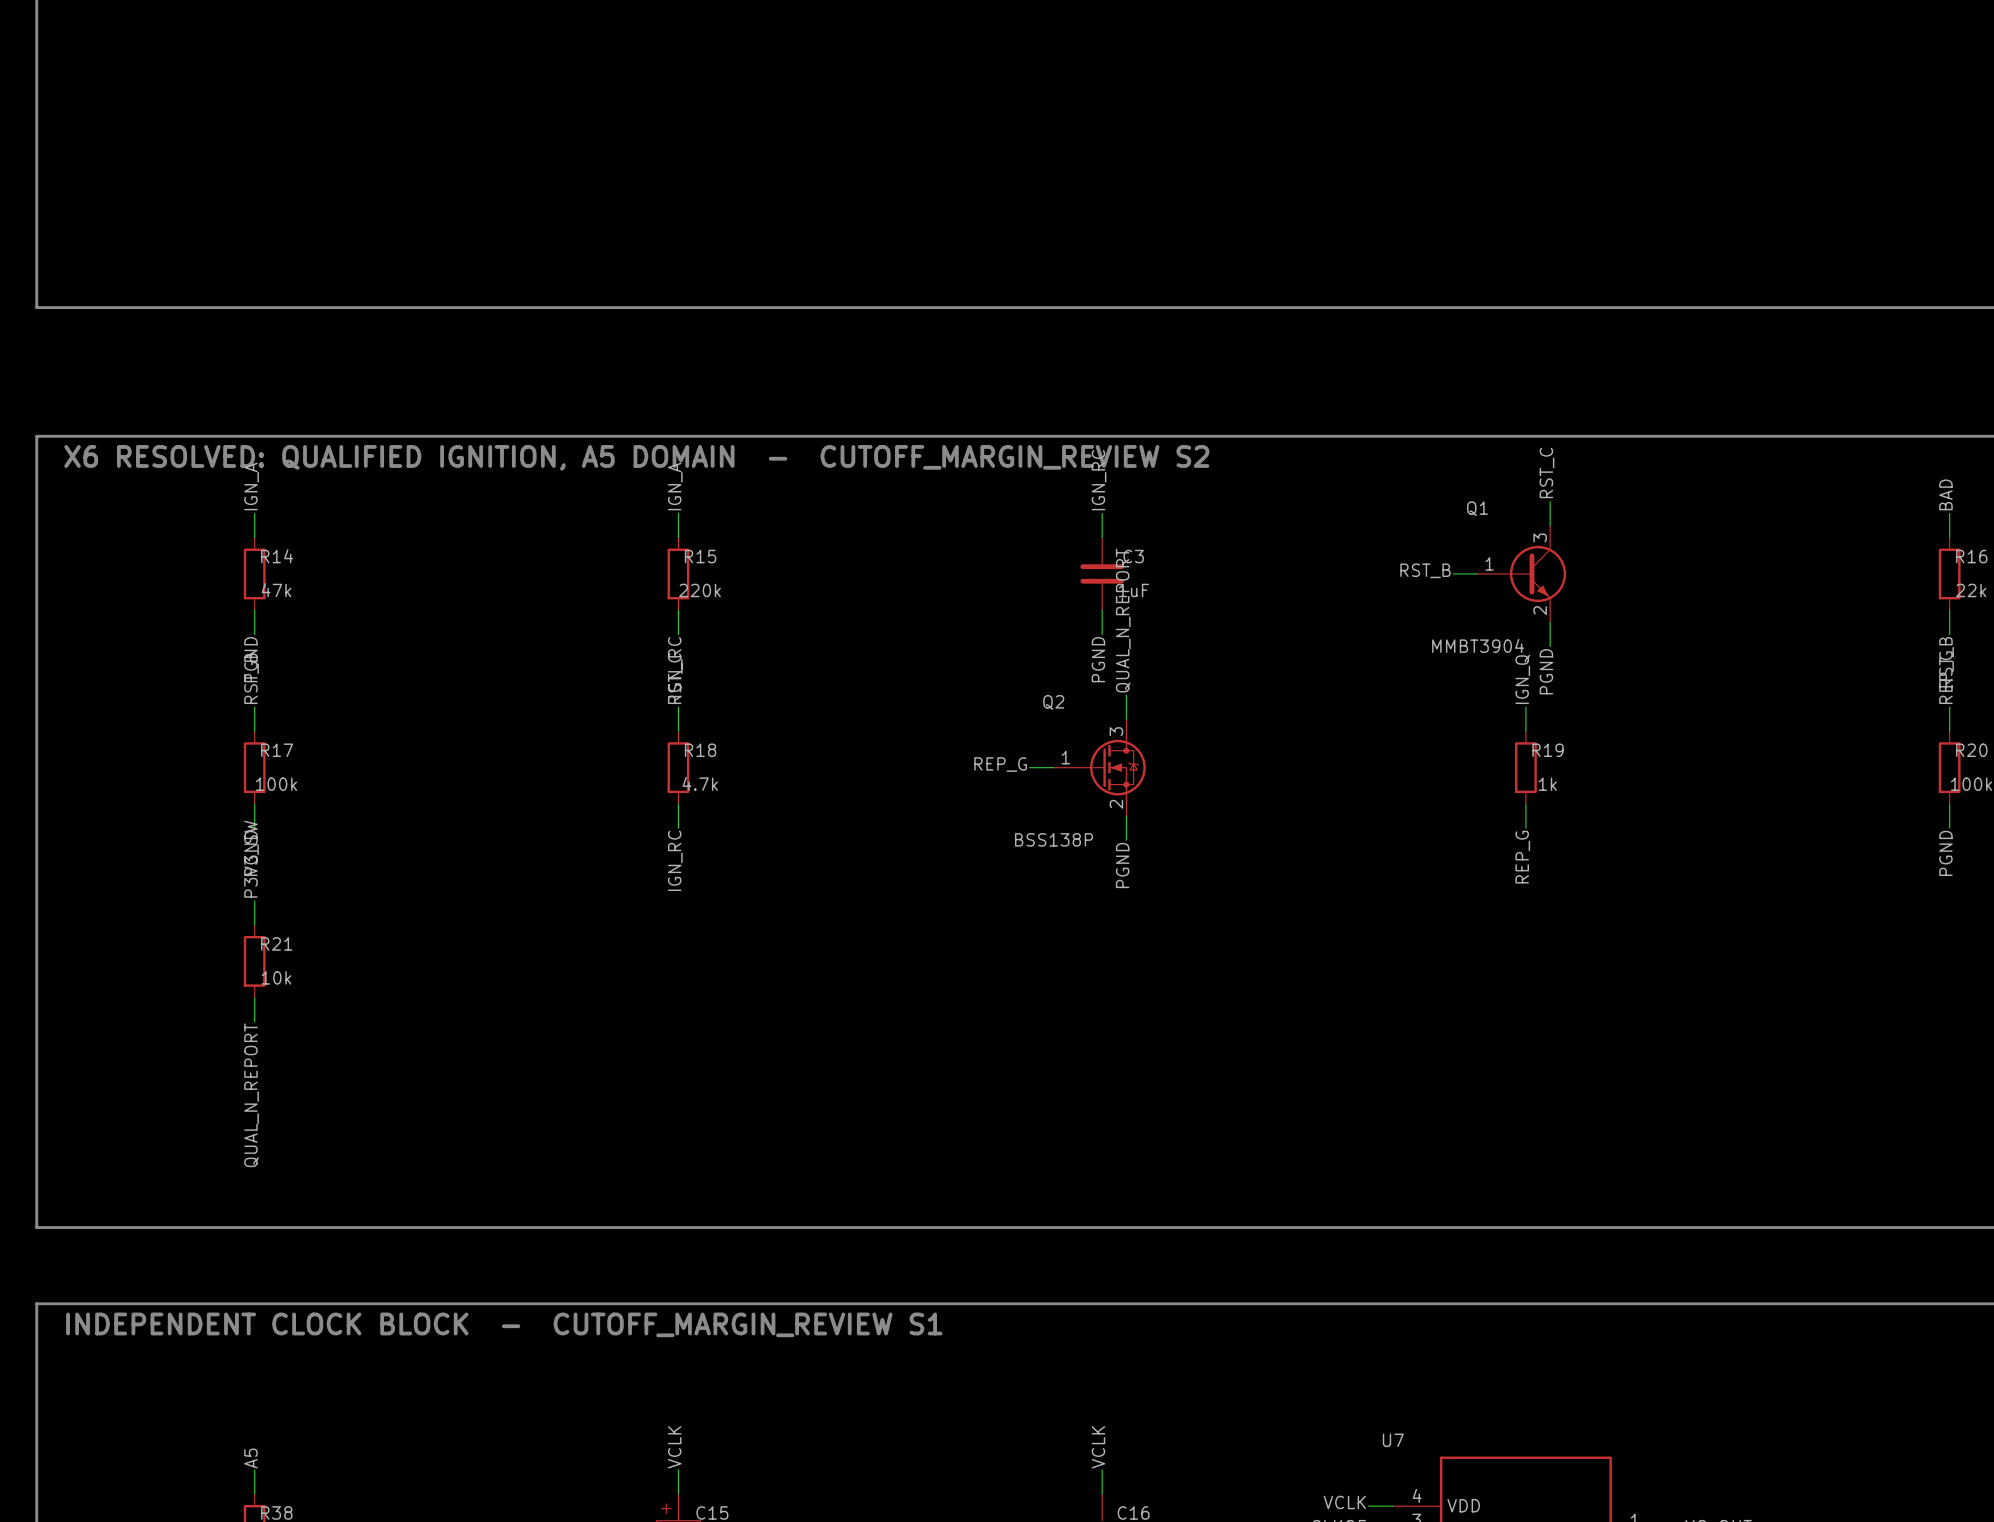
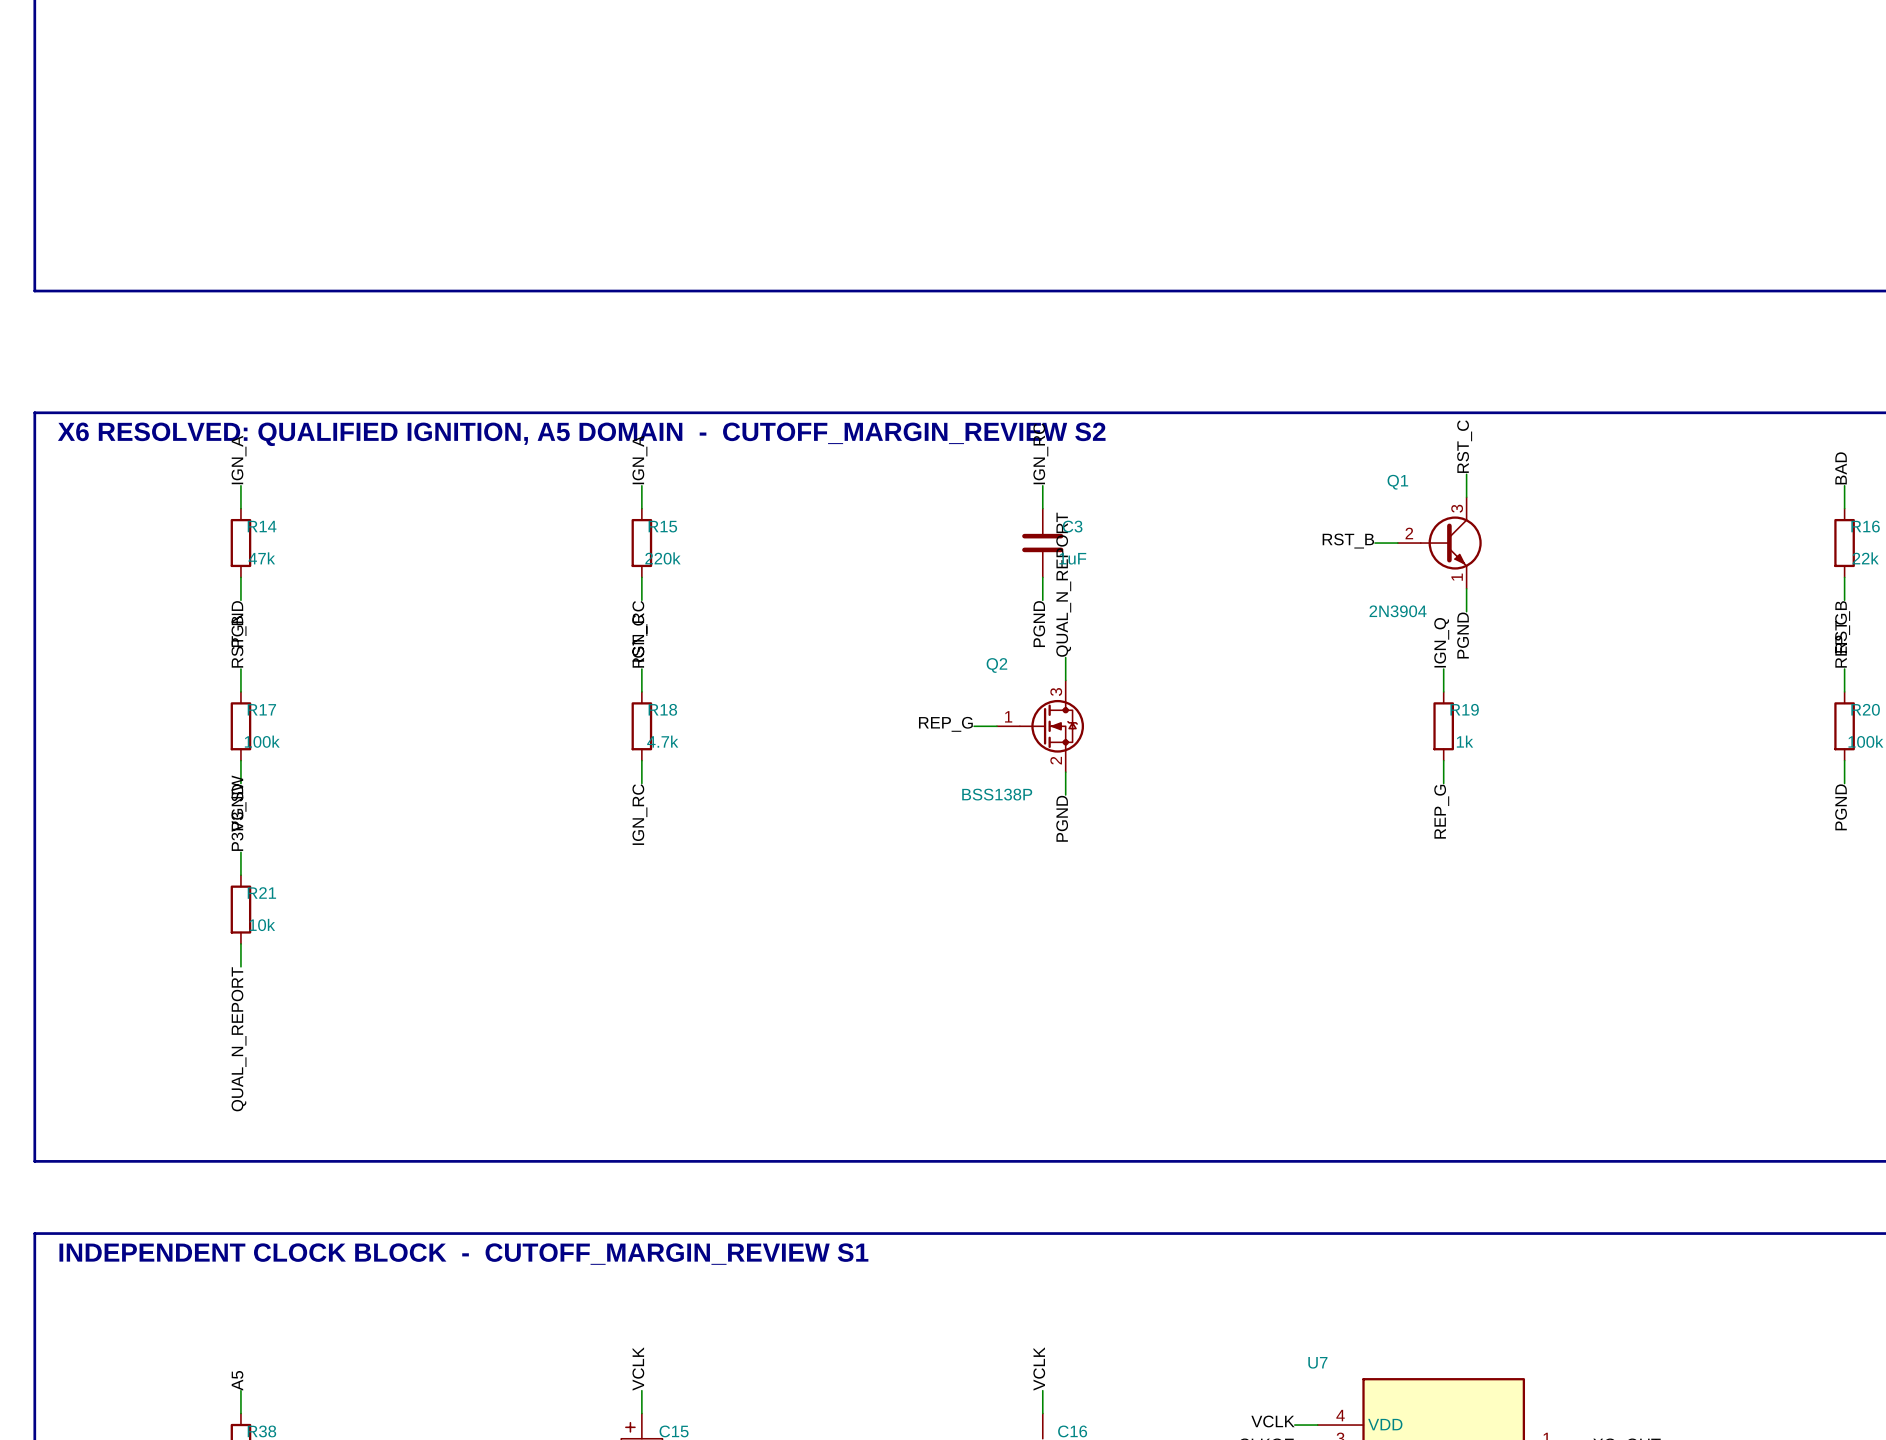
Q1 pin number: 1 (1489, 563) -> 2 (1409, 533)
Q1 pin number: 2 (1540, 610) -> 1 (1457, 577)
Q1 value: MMBT3904 (1478, 645) -> 2N3904 (1398, 611)

